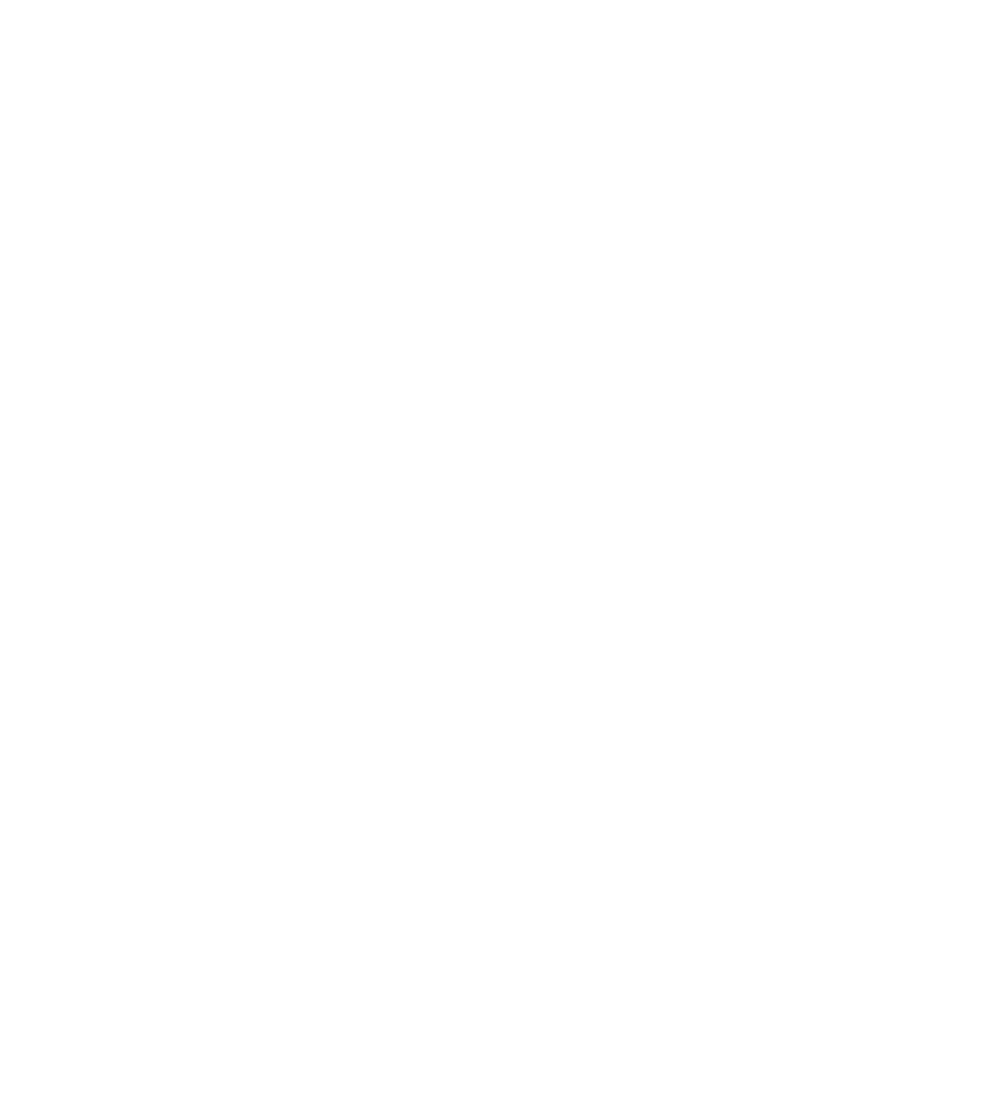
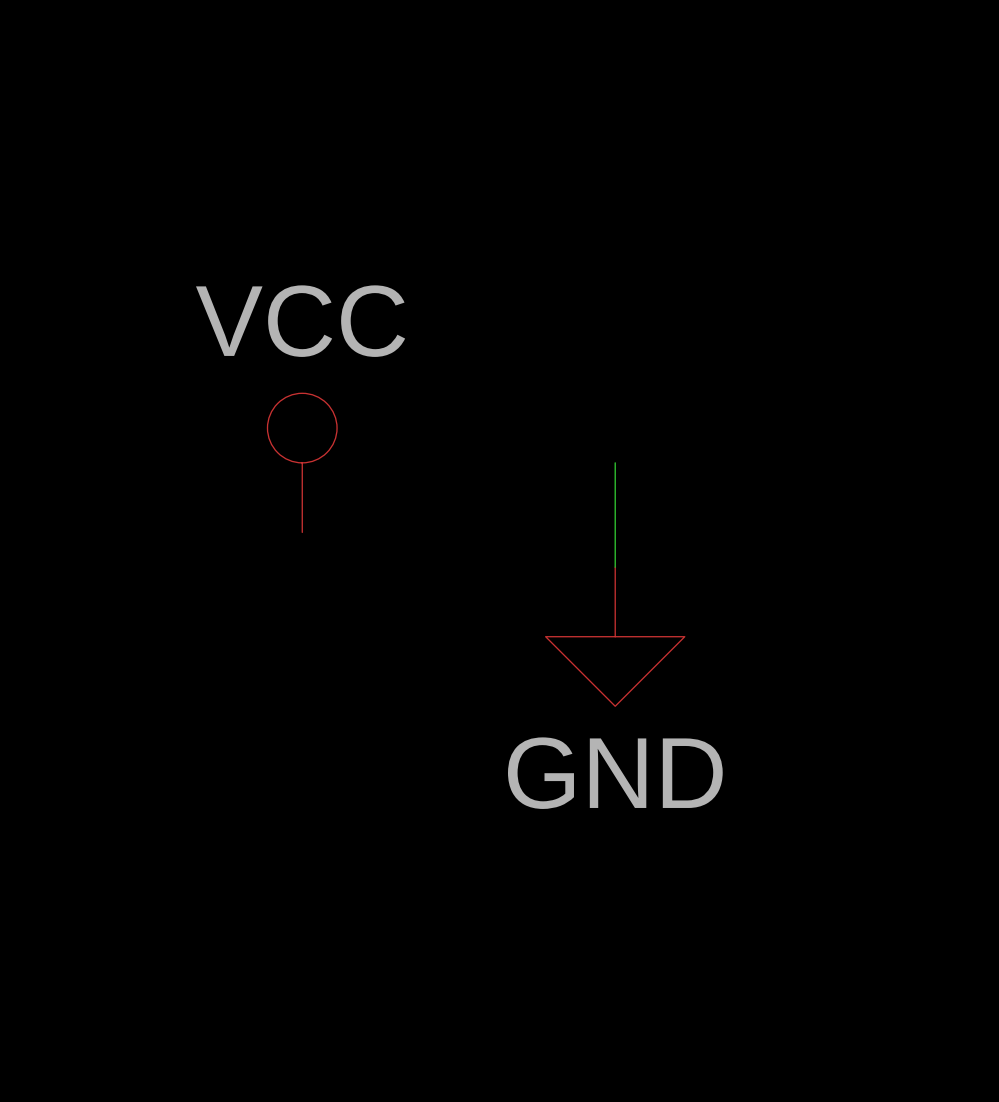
power symbol: none -> VCC (302, 462)
wire: none -> (615, 462) (615, 567)
power symbol: none -> GND (615, 636)

